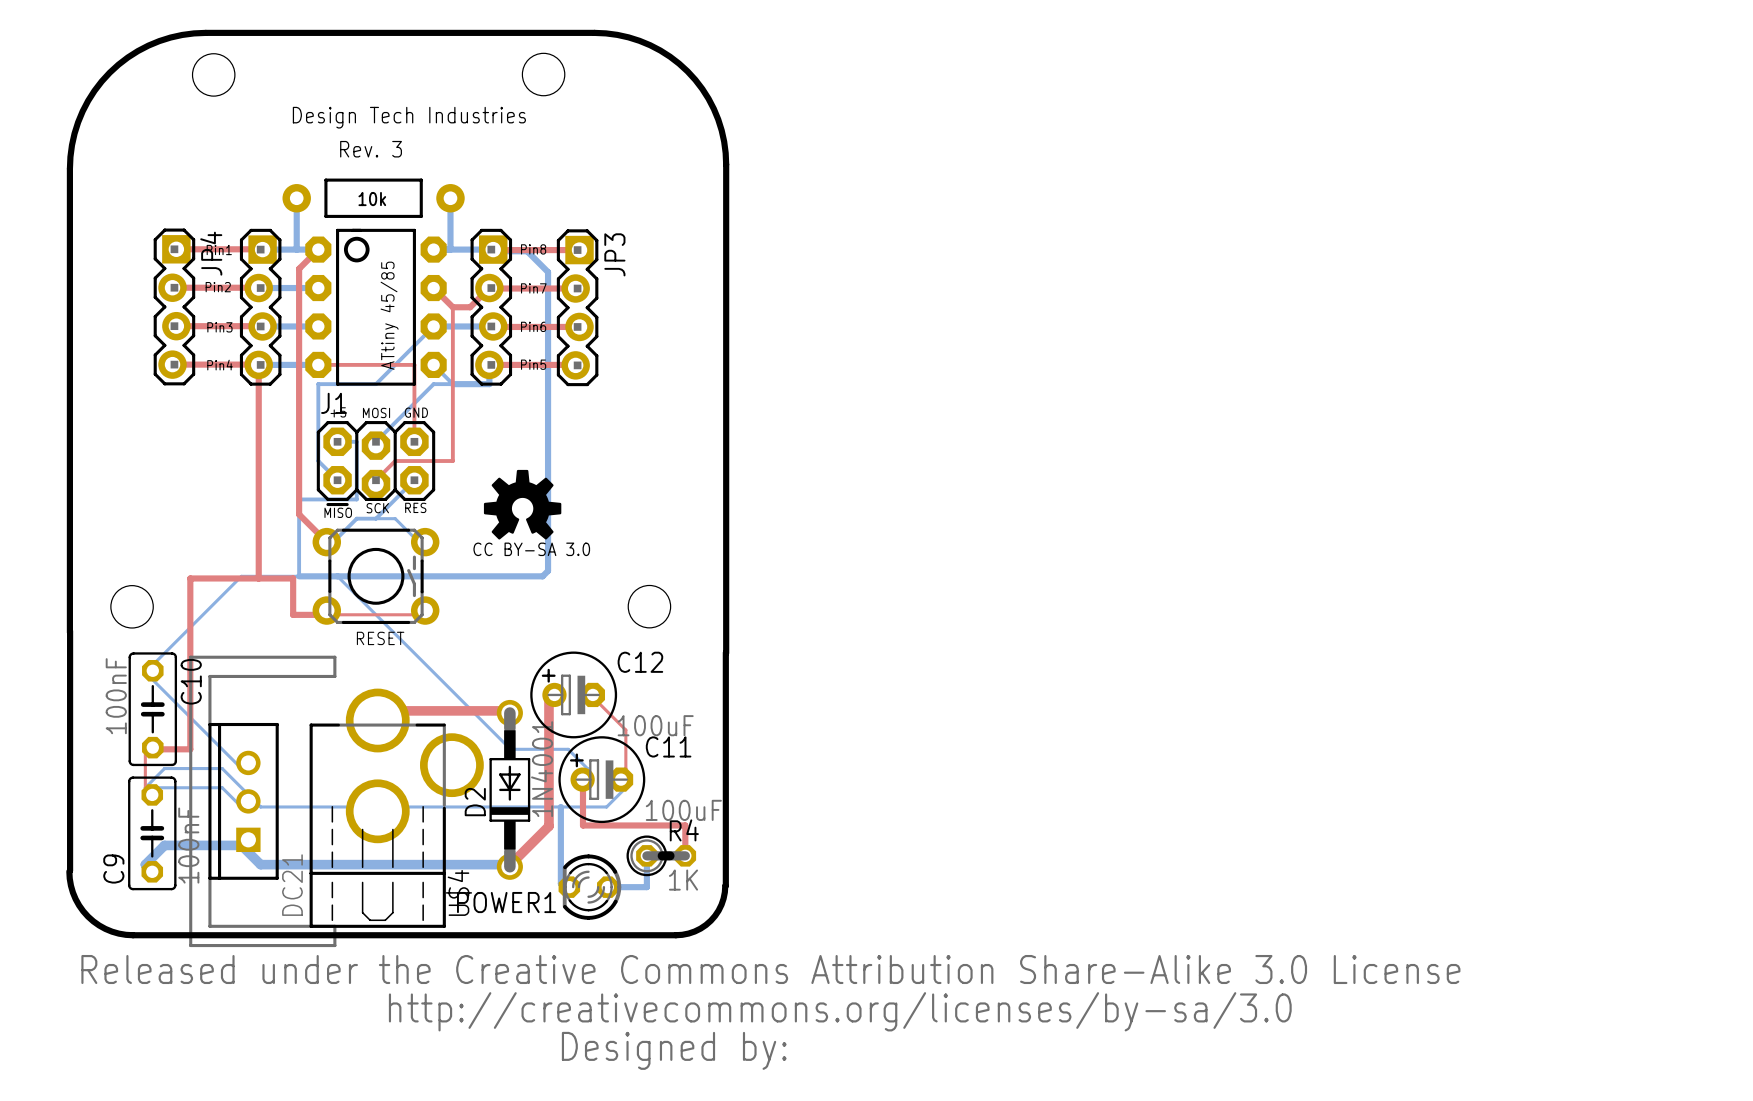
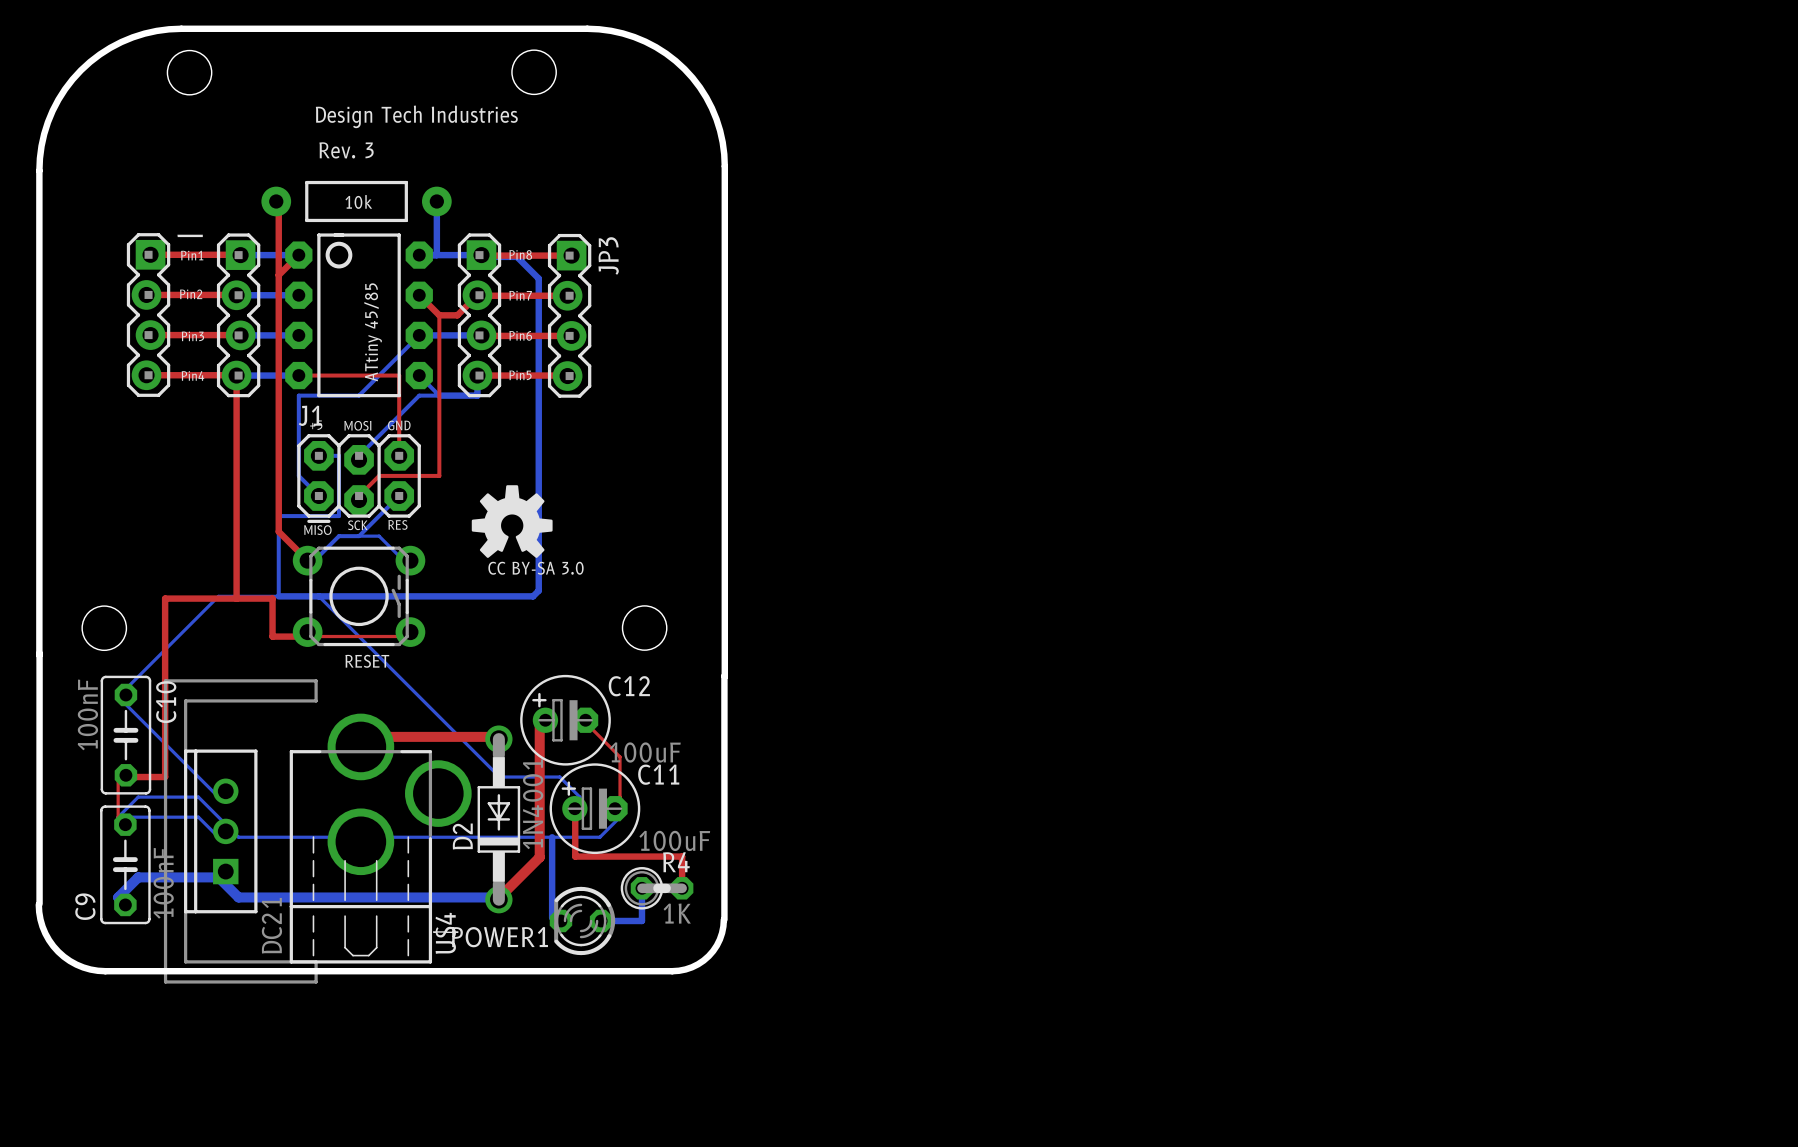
bottom track: (296, 198) (296, 249) -> none
top track: none -> (276, 201) (278, 201) (278, 275)
JP4 name: JP4 (211, 253) -> | (190, 235)
drawing: [81, 954, 1461, 1070] -> none

